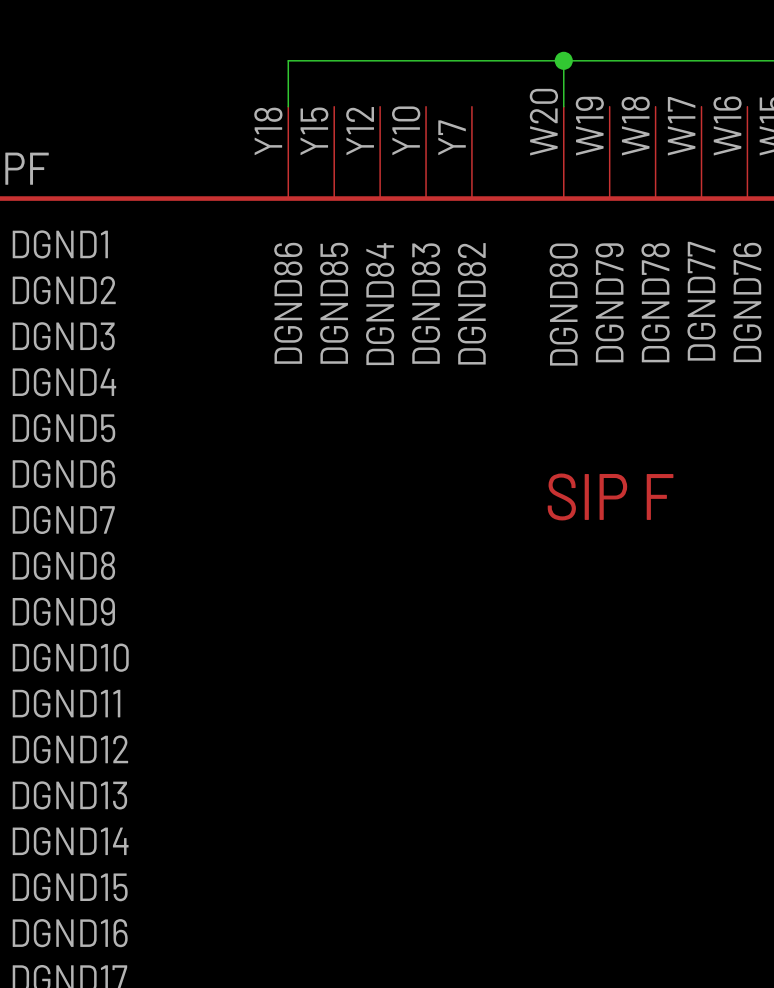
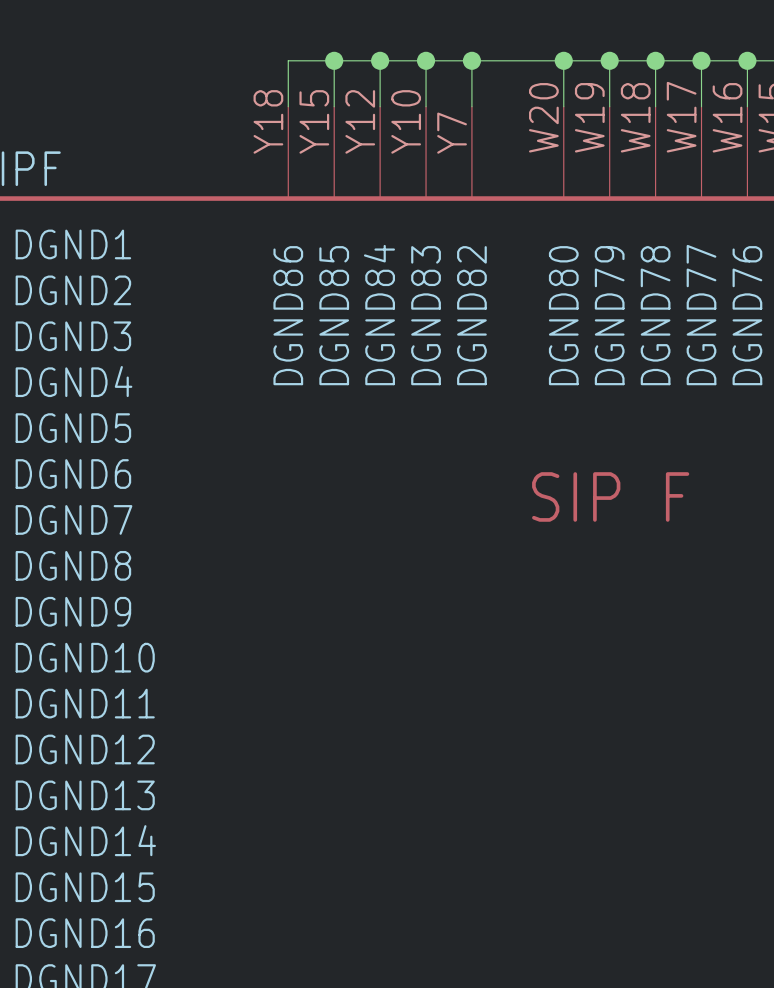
wire: none -> (334, 60) (334, 106)
junction: none -> (334, 60)
wire: none -> (380, 60) (380, 106)
junction: none -> (380, 60)
wire: none -> (426, 60) (426, 106)
junction: none -> (426, 60)
wire: none -> (471, 60) (471, 106)
junction: none -> (471, 60)
wire: none -> (609, 60) (609, 106)
junction: none -> (609, 60)
wire: none -> (655, 60) (655, 106)
junction: none -> (655, 60)
wire: none -> (701, 60) (701, 106)
junction: none -> (701, 60)
wire: none -> (747, 60) (747, 106)
junction: none -> (747, 60)

